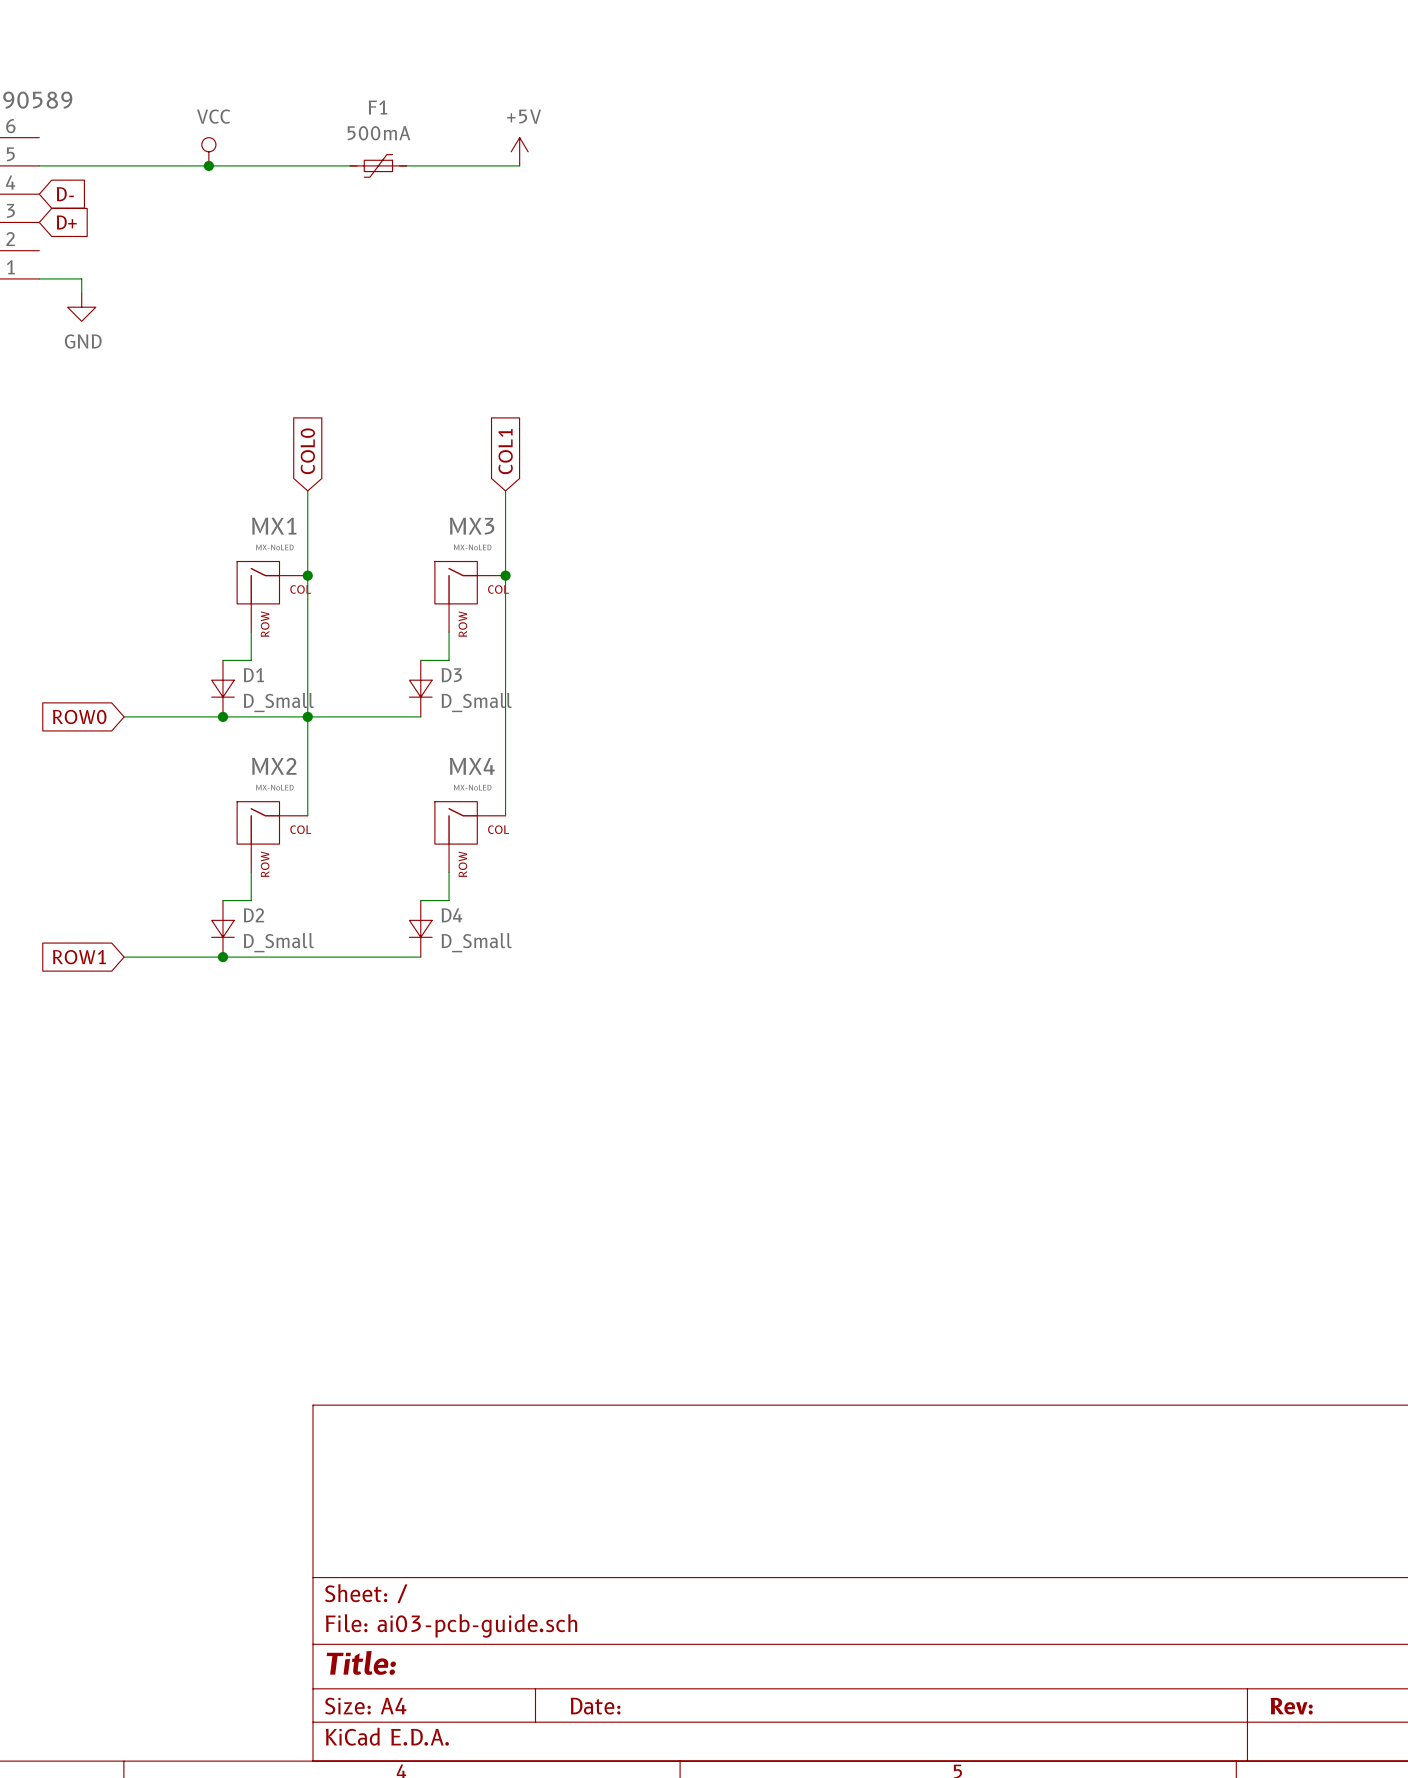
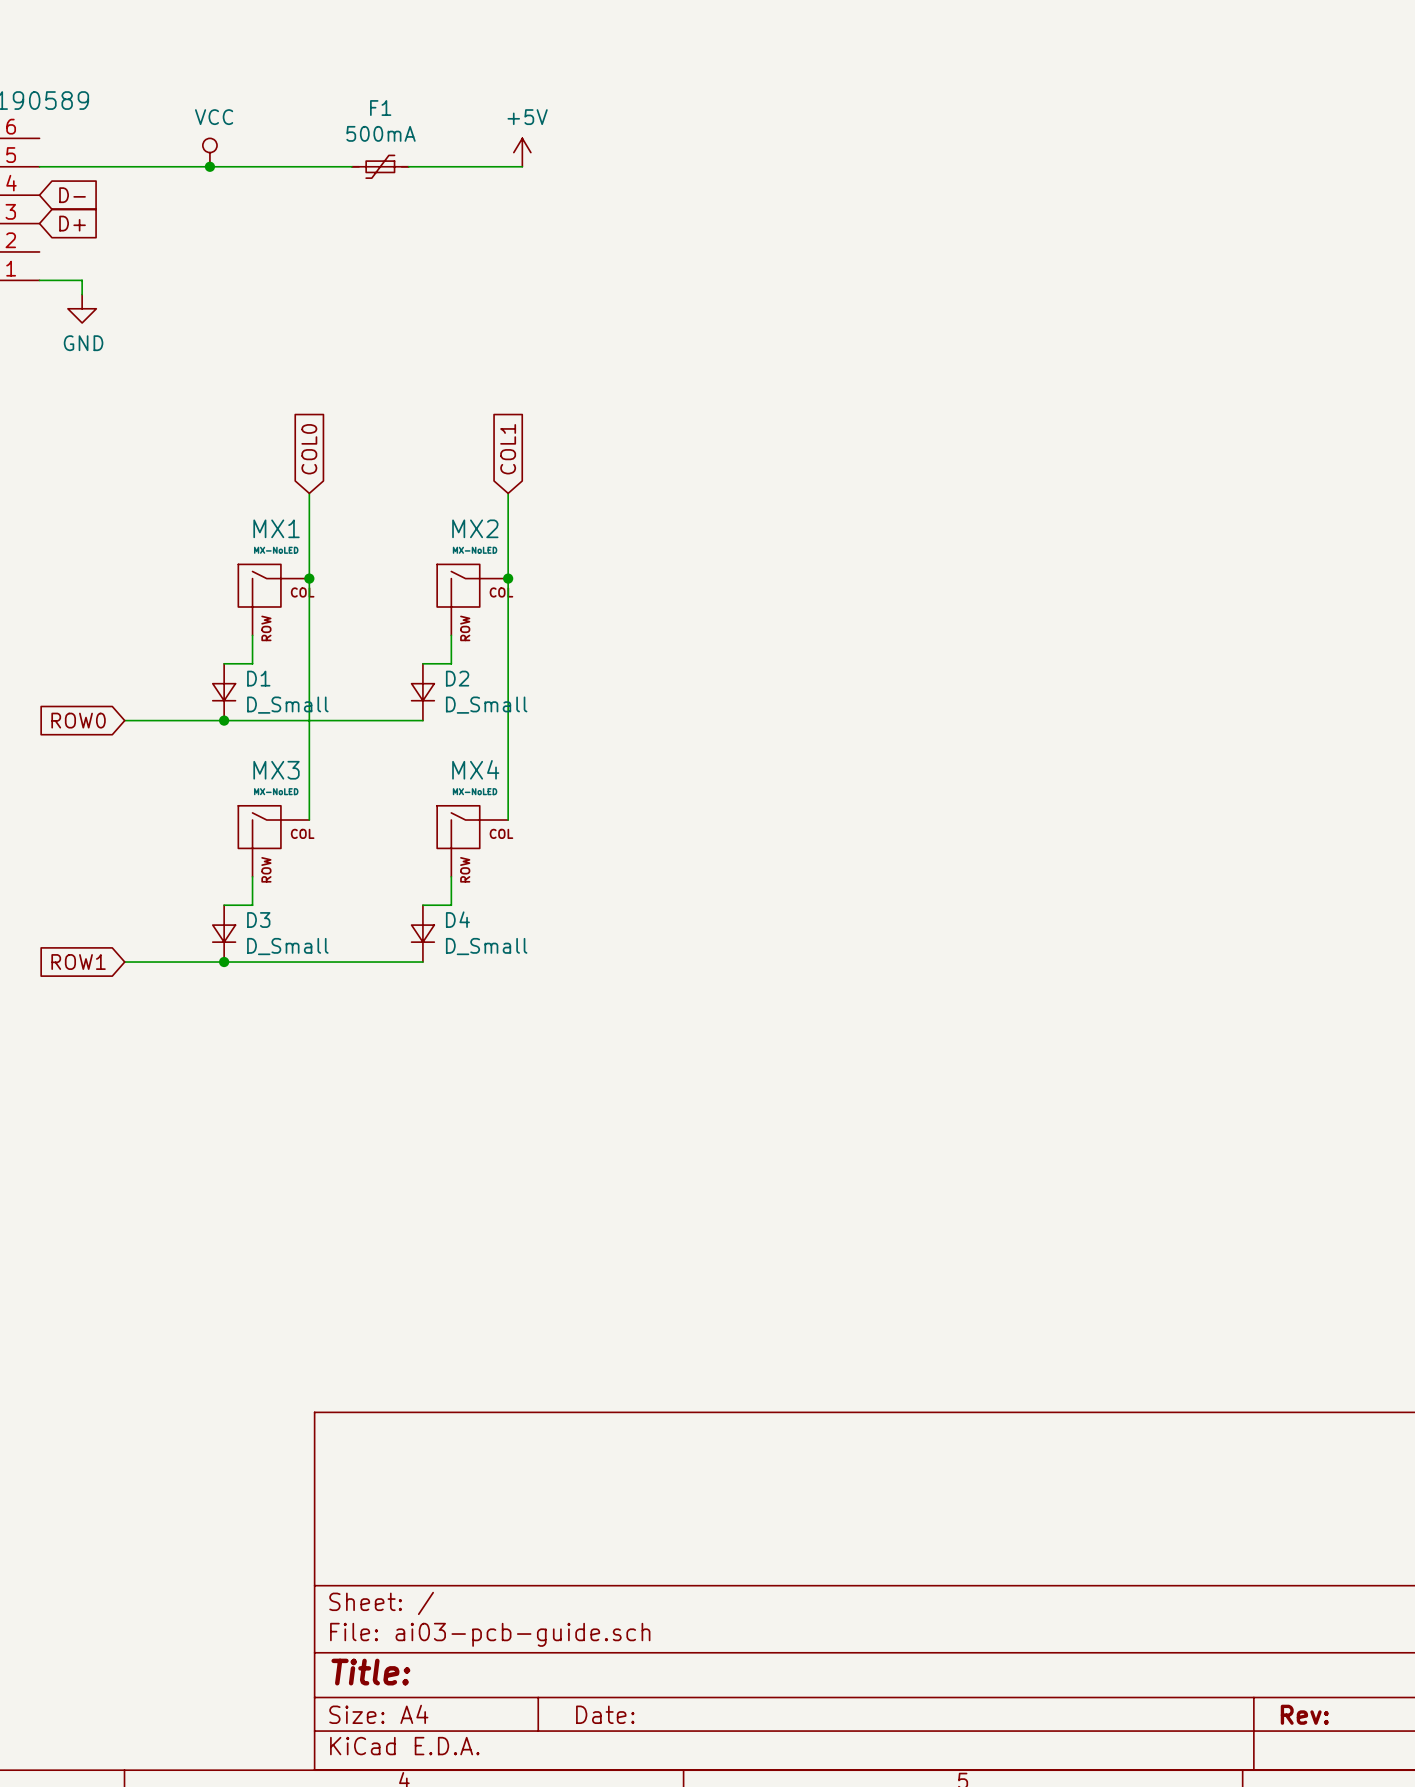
MX3 name: MX3 (472, 526) -> MX2 (475, 528)
D3 name: D3 (451, 675) -> D2 (457, 678)
junction: (307, 716) -> none
MX2 name: MX2 (274, 766) -> MX3 (276, 770)
D2 name: D2 (253, 915) -> D3 (258, 920)

